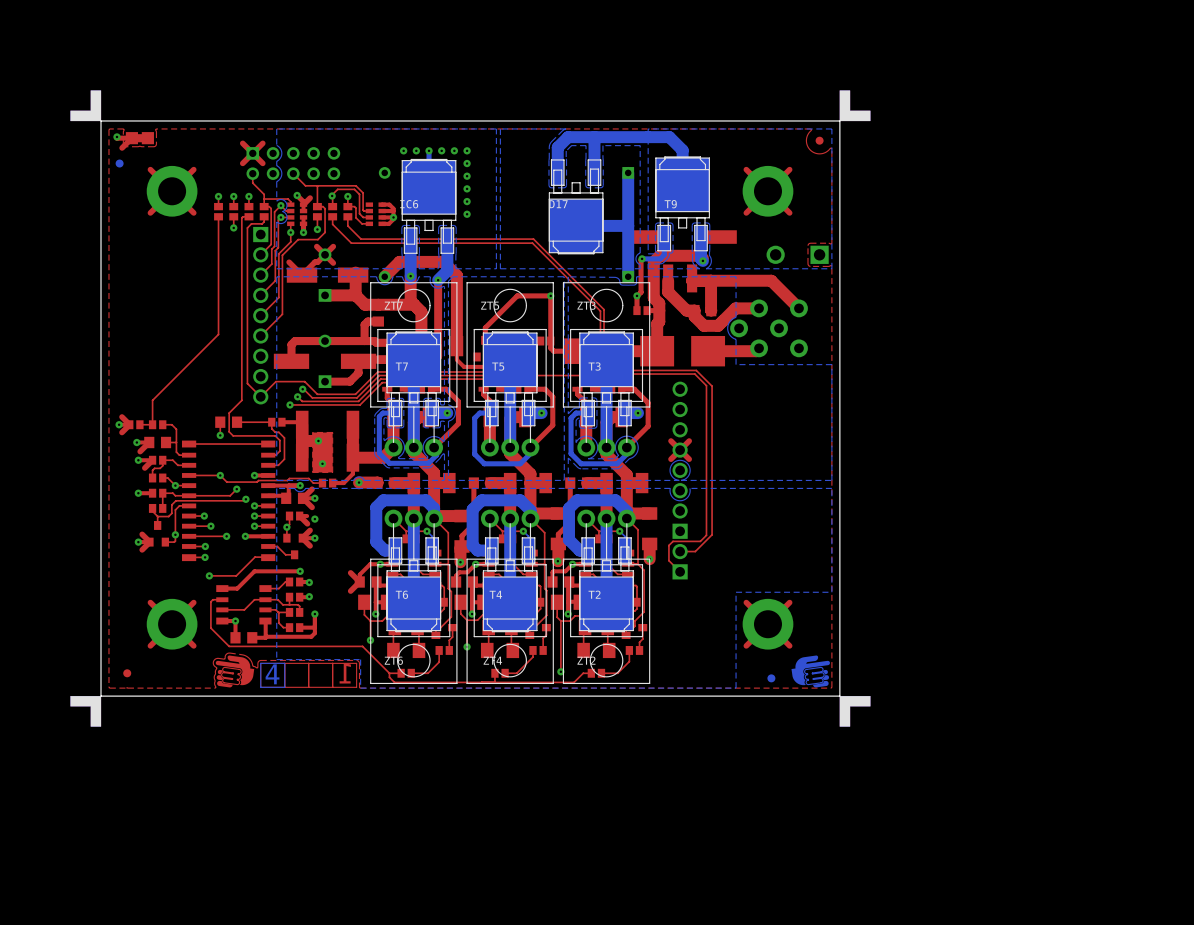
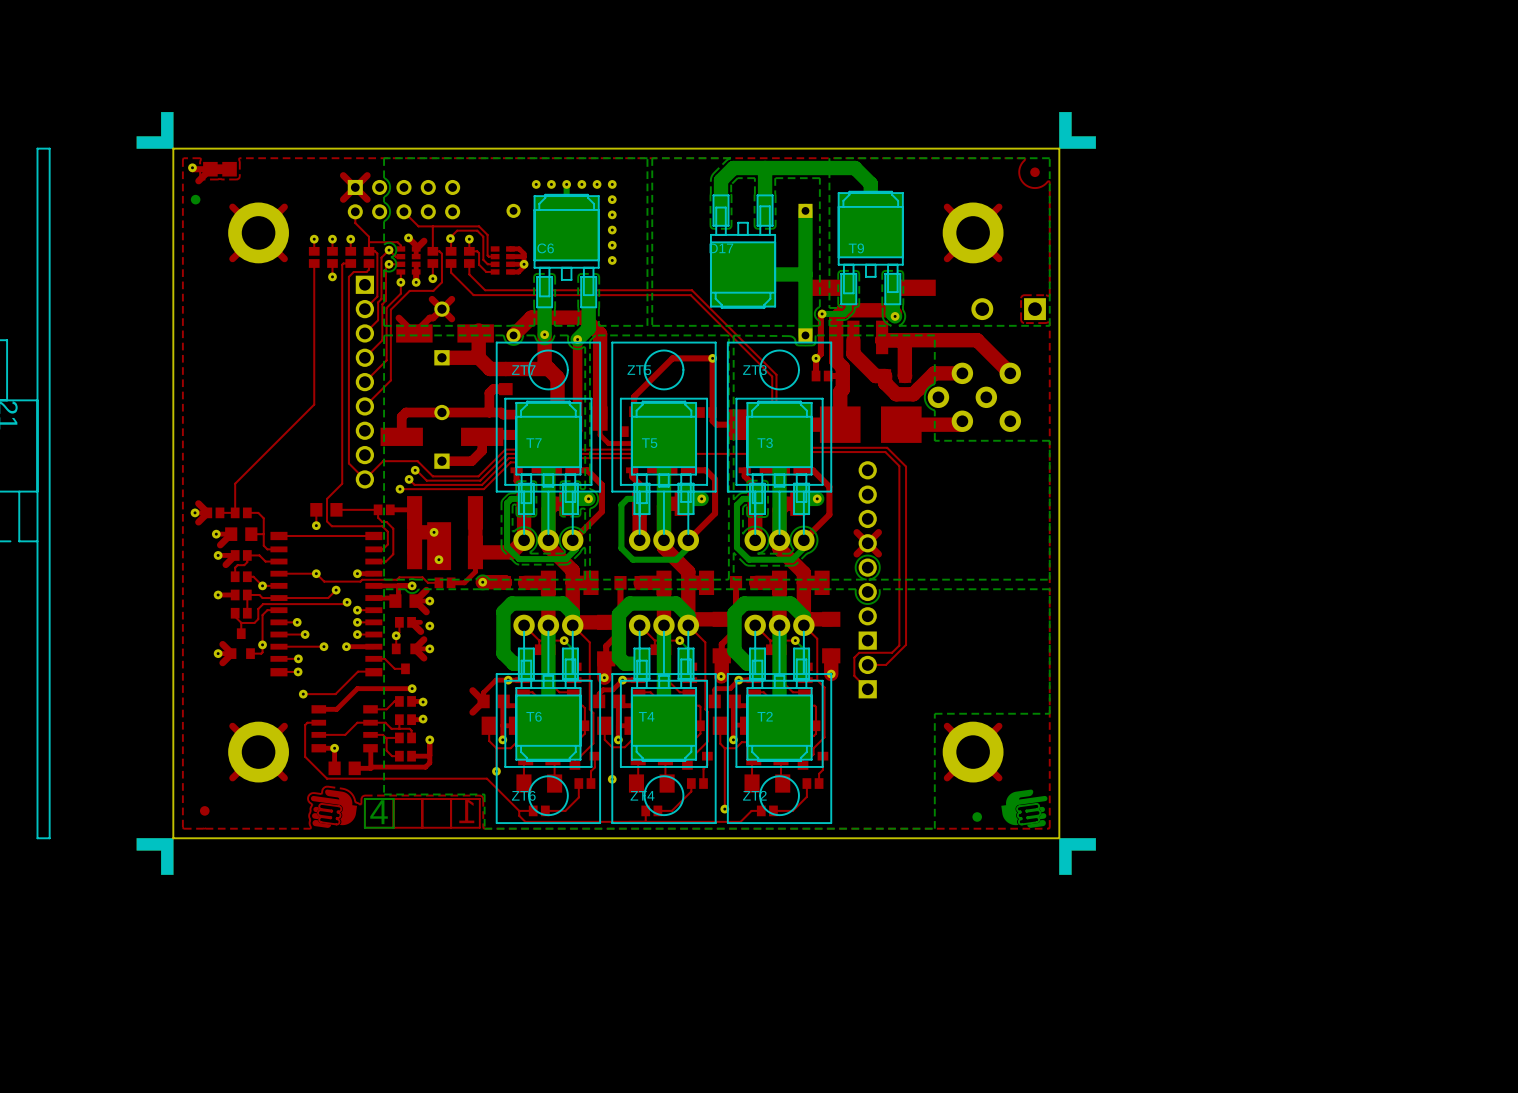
top zone outline: (332, 432) (312, 432) (312, 472) (332, 472) (332, 432) -> none

